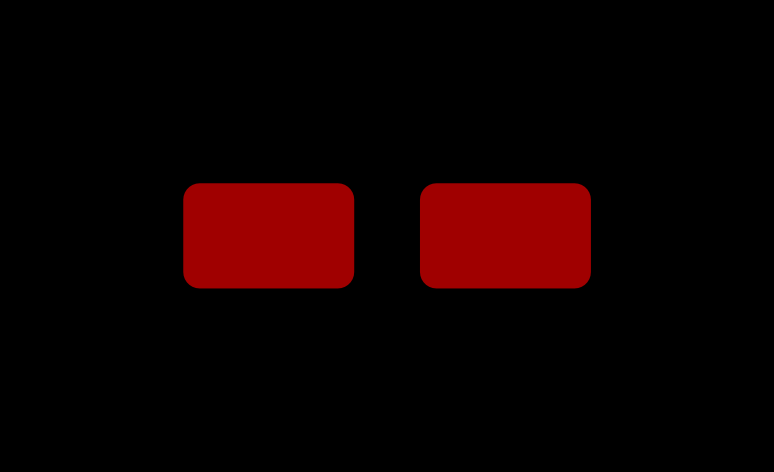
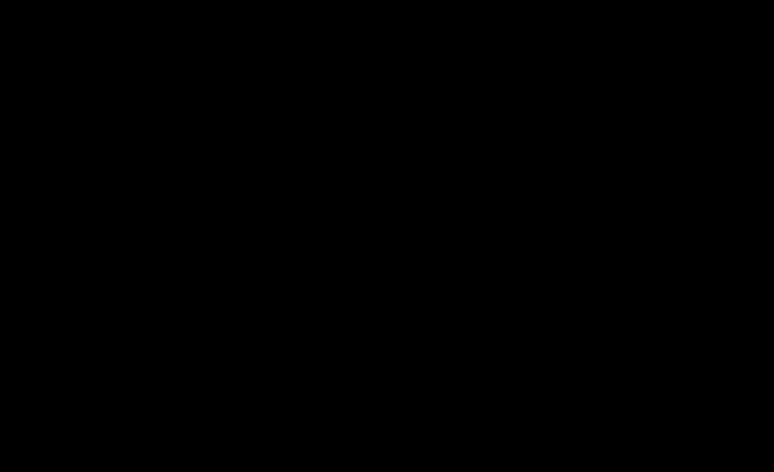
part: (387, 235) -> none

